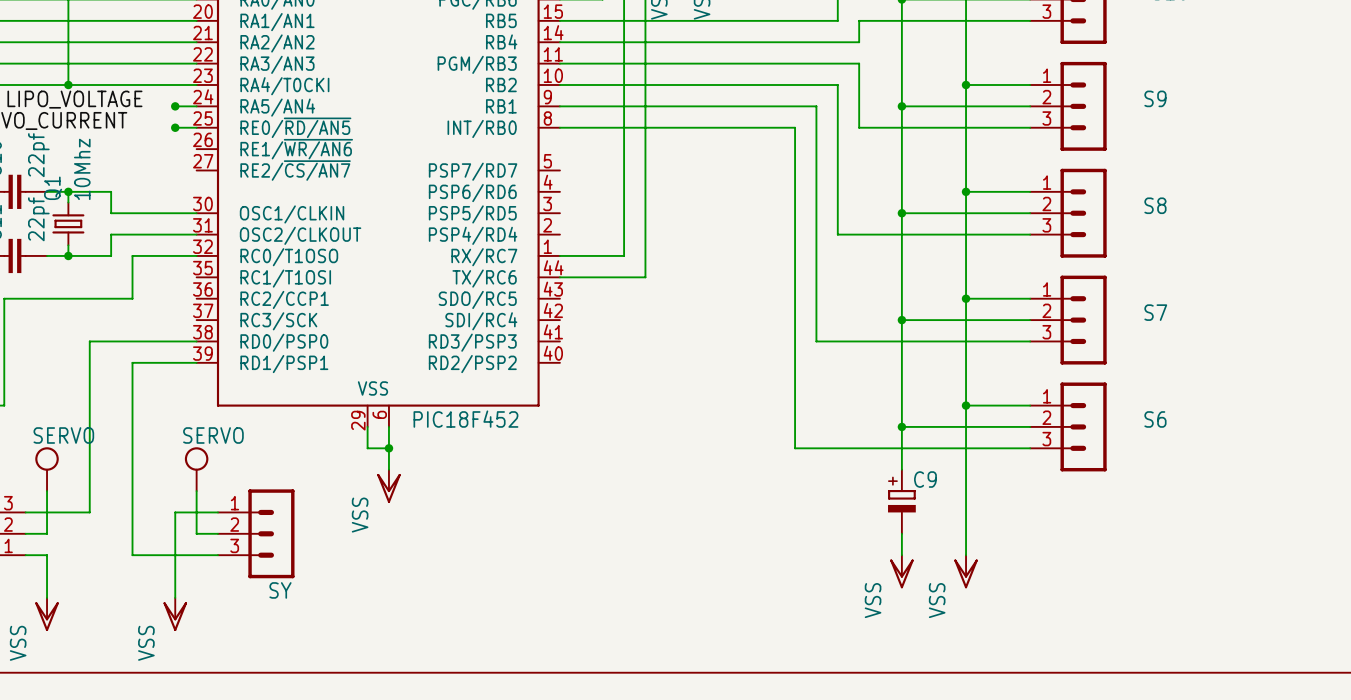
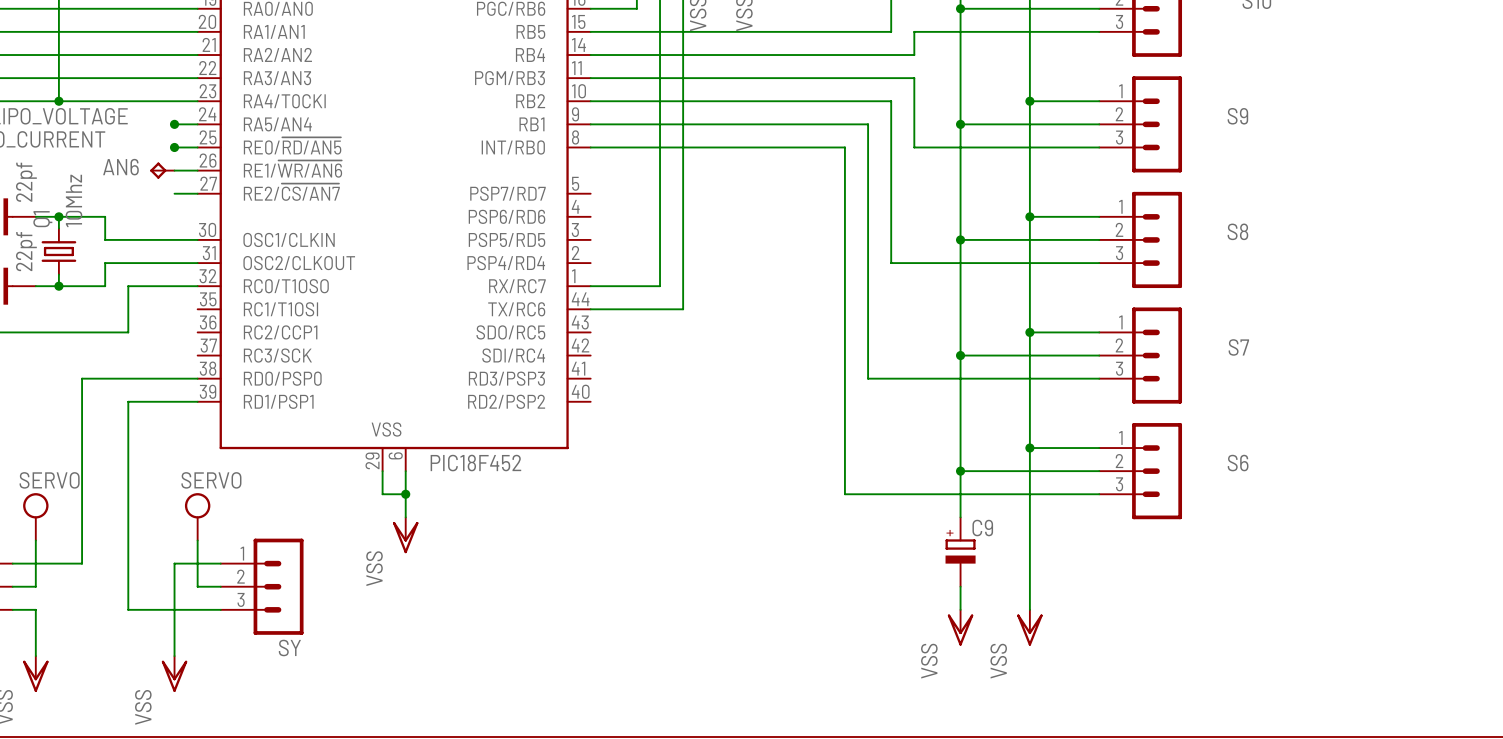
AN6: none -> (162, 170)
wire: none -> (174, 170) (197, 170)
wire: none -> (174, 193) (197, 193)

